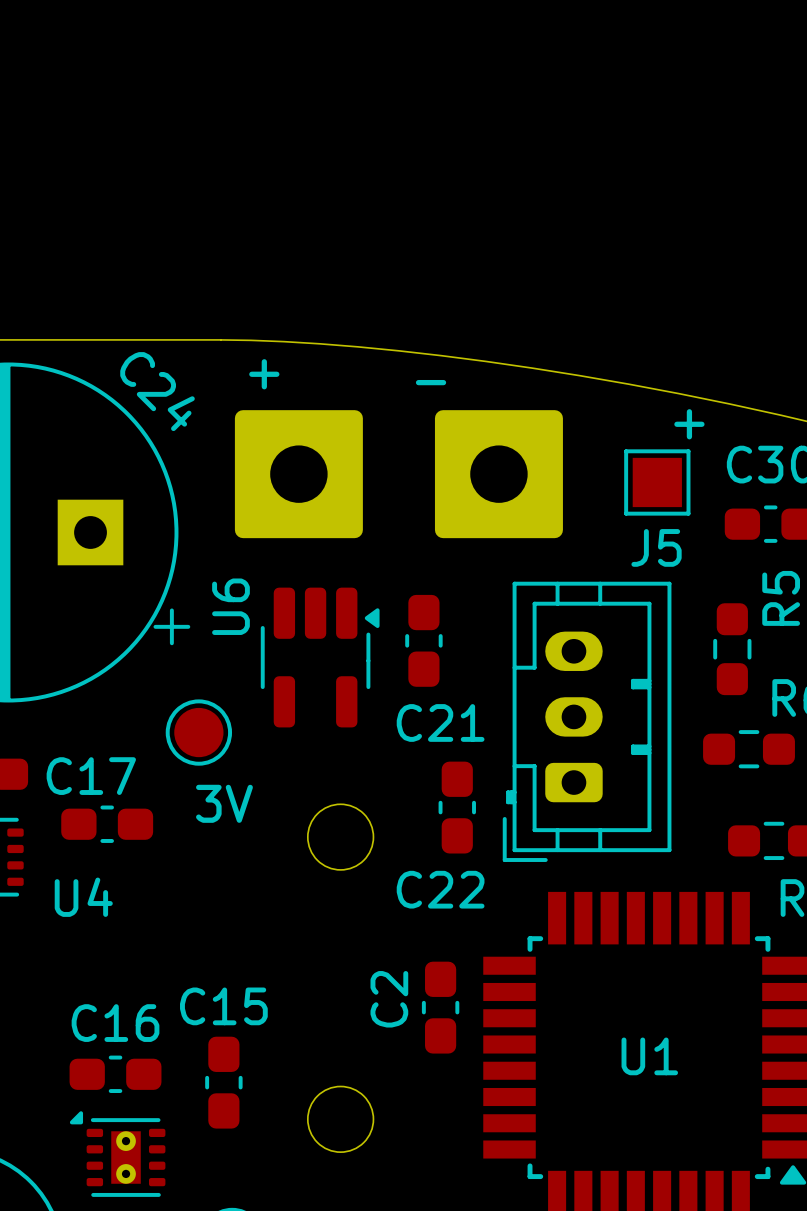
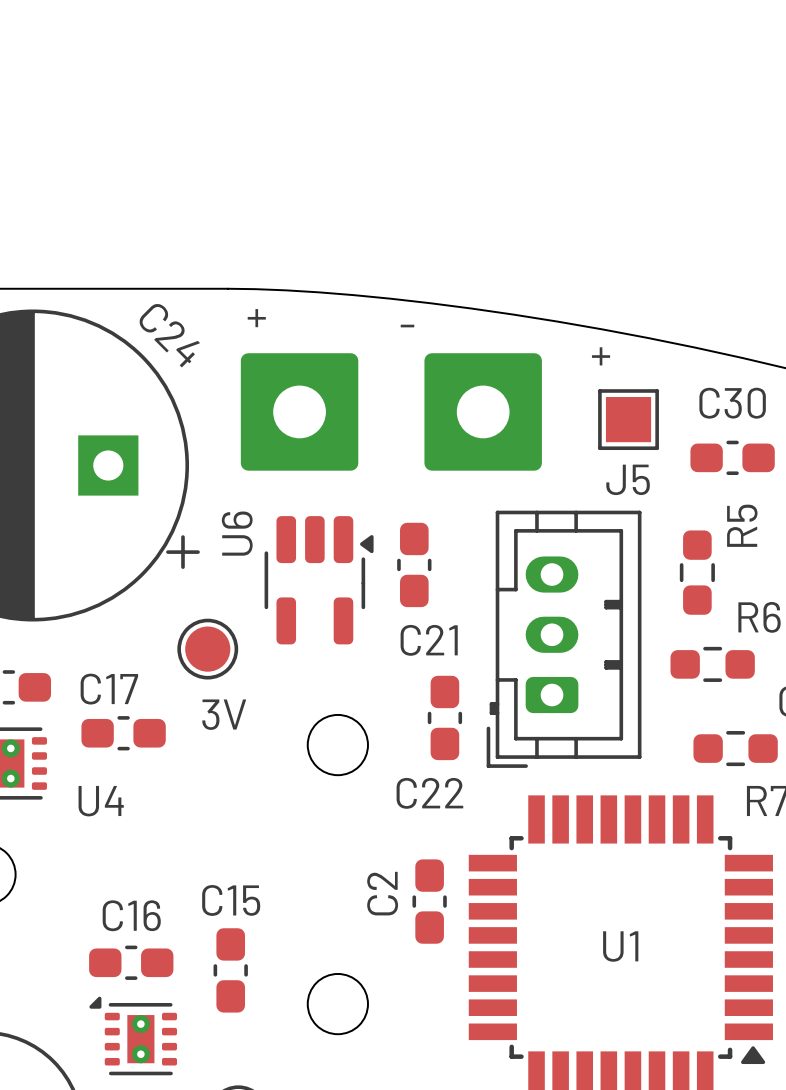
text position: + (689, 424) -> + (601, 356)

